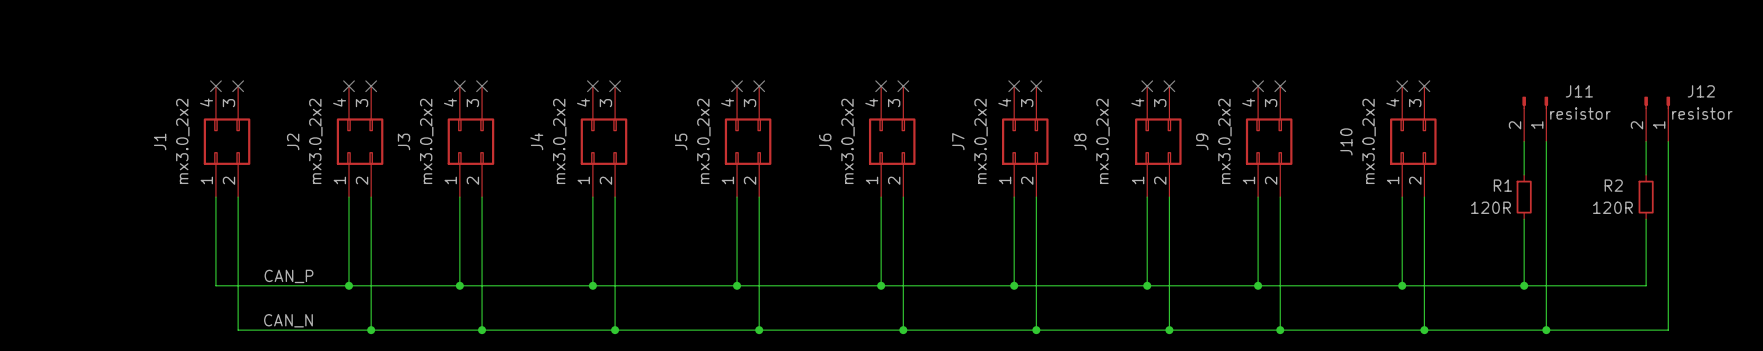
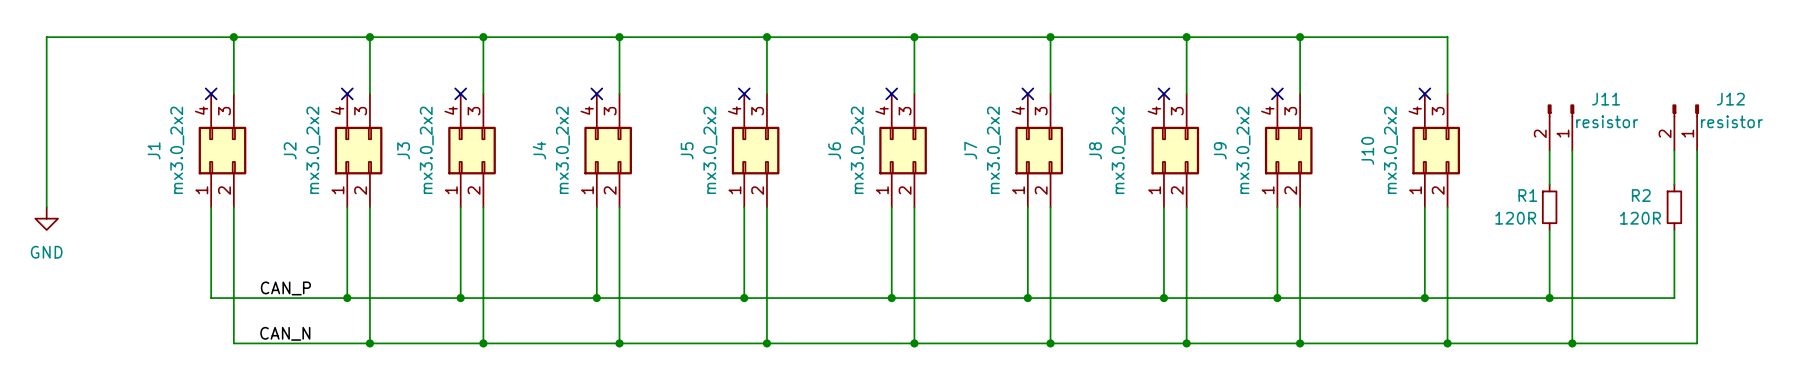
wire: none -> (233, 37) (233, 93)
junction: none -> (233, 37)
wire: none -> (369, 37) (369, 93)
junction: none -> (369, 37)
wire: none -> (483, 37) (483, 93)
junction: none -> (483, 37)
wire: none -> (619, 37) (619, 93)
junction: none -> (619, 37)
wire: none -> (766, 37) (766, 93)
junction: none -> (766, 37)
wire: none -> (914, 37) (914, 93)
junction: none -> (914, 37)
wire: none -> (1050, 37) (1050, 93)
junction: none -> (1050, 37)
wire: none -> (1186, 37) (1186, 93)
junction: none -> (1186, 37)
wire: none -> (1300, 37) (1300, 93)
junction: none -> (1300, 37)
no-connect mark: (238, 86) -> none
no-connect mark: (371, 86) -> none
no-connect mark: (482, 86) -> none
no-connect mark: (615, 86) -> none
no-connect mark: (759, 86) -> none
no-connect mark: (903, 86) -> none
no-connect mark: (1036, 86) -> none
no-connect mark: (1169, 86) -> none
no-connect mark: (1280, 86) -> none
wire: none -> (1447, 93) (1447, 37) (46, 37) (46, 207)
no-connect mark: (1424, 86) -> none
power symbol: none -> GND (46, 218)

